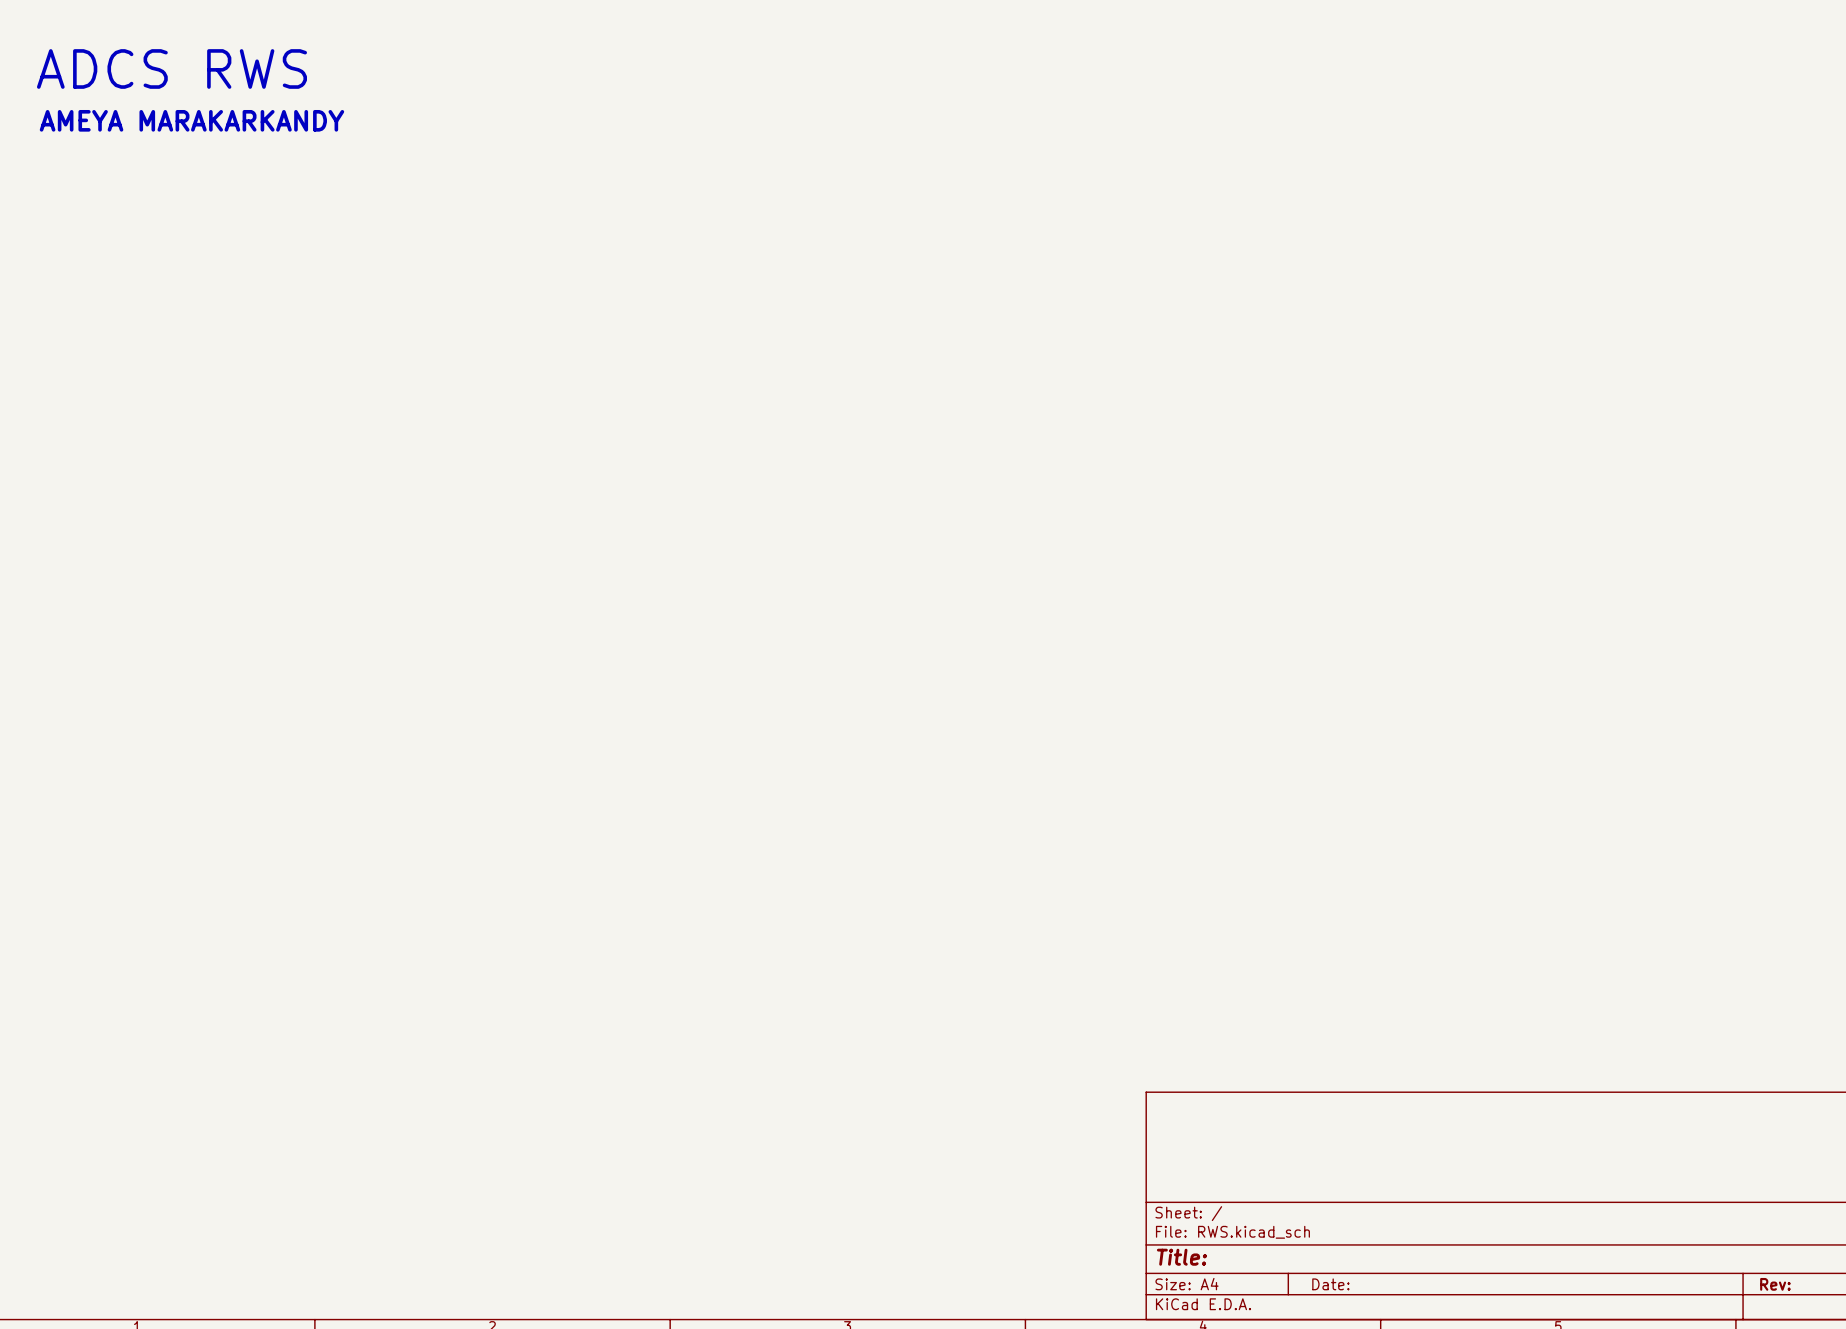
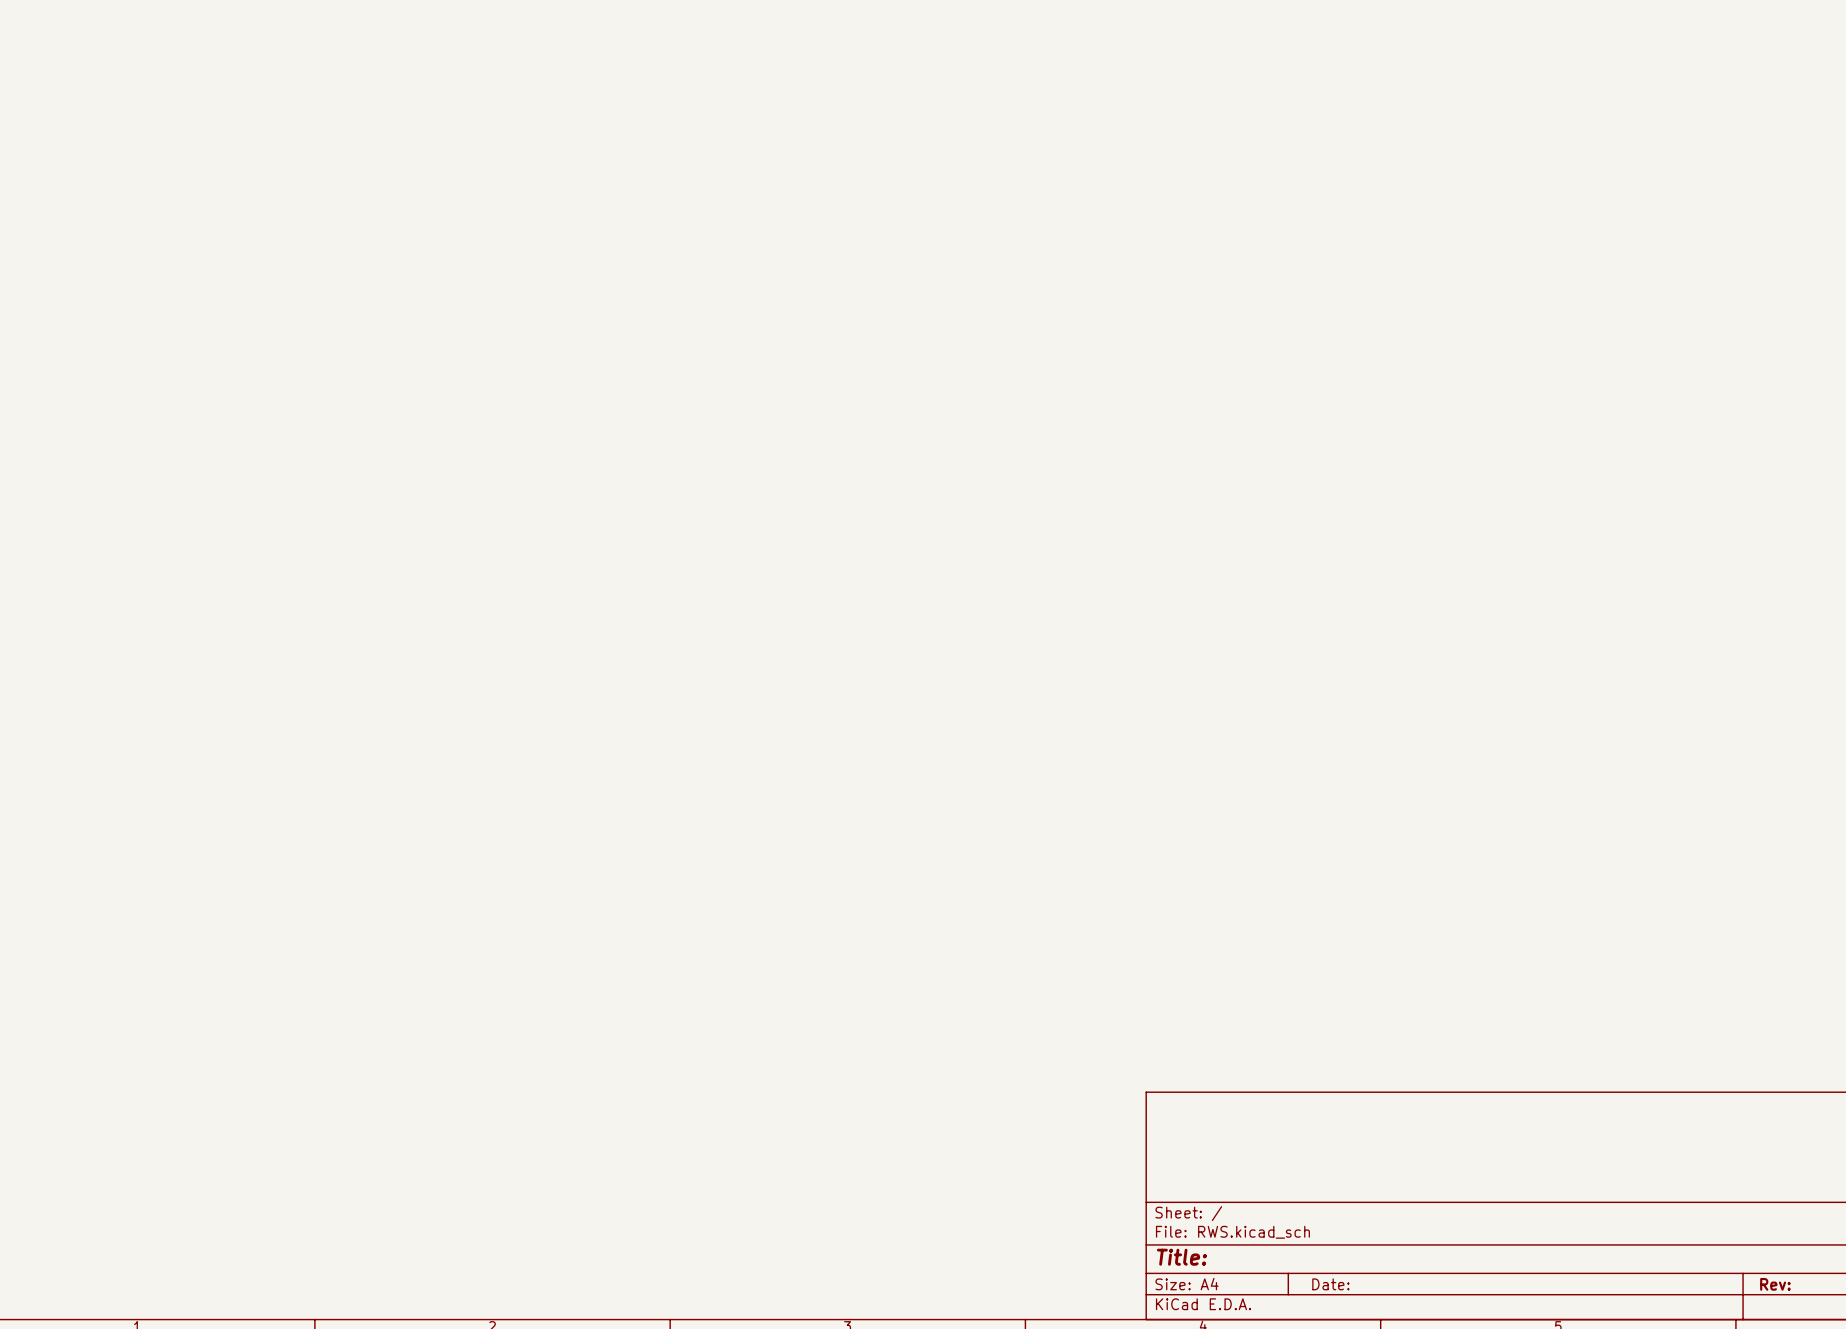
text: ADCS RWS (171, 68) -> none
text: AMEYA MARAKARKANDY (191, 120) -> none

